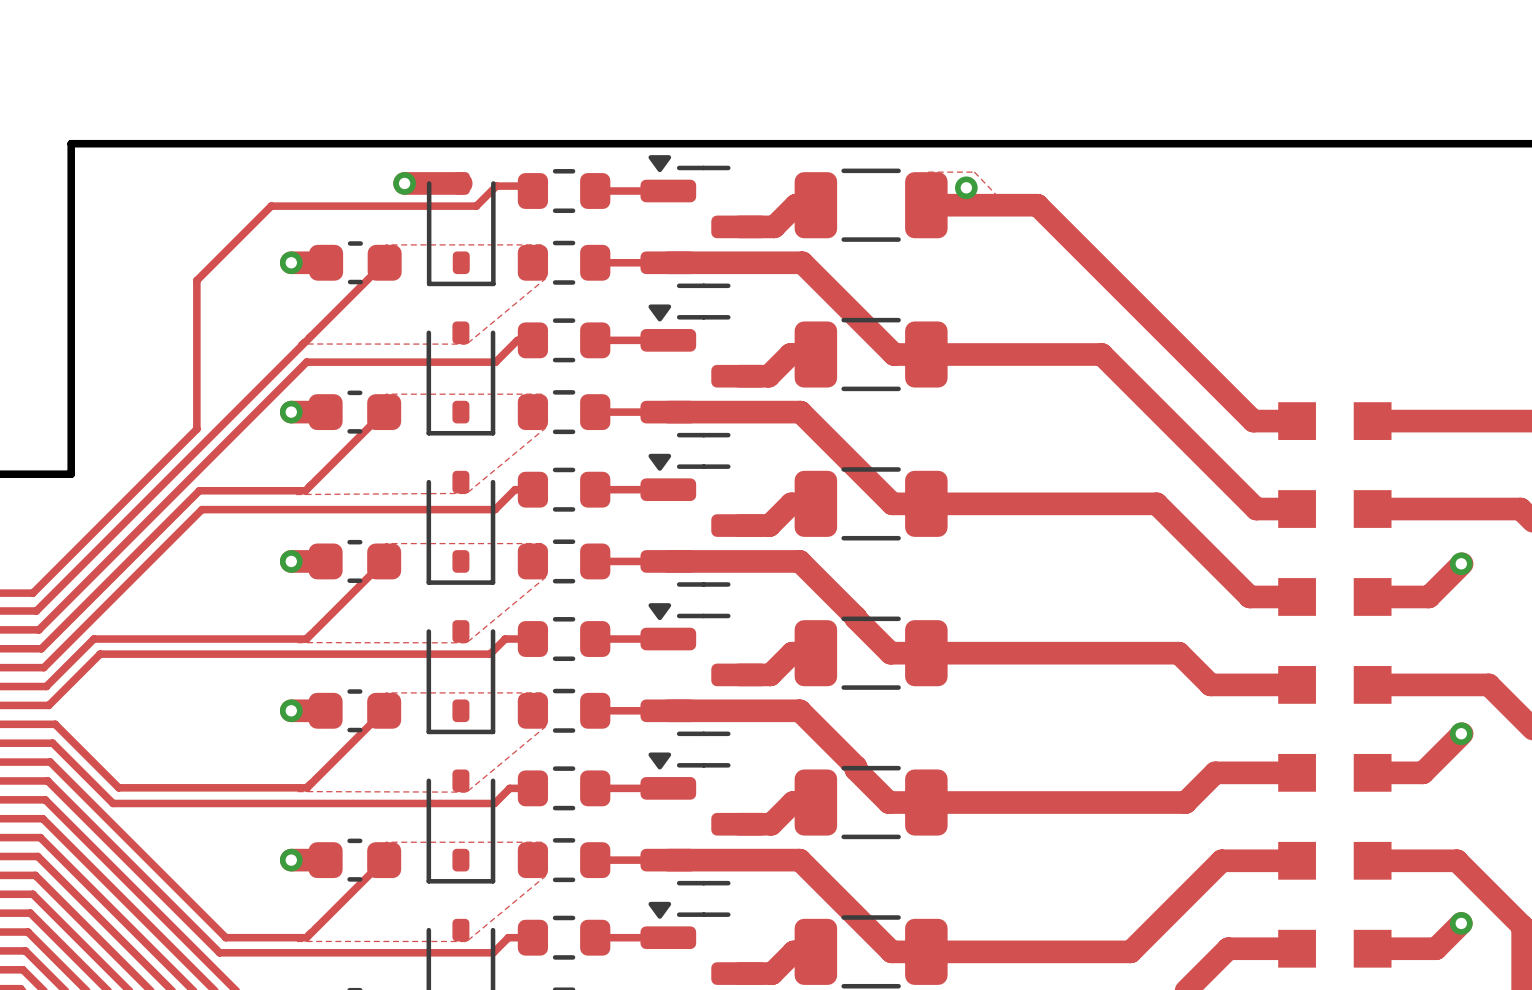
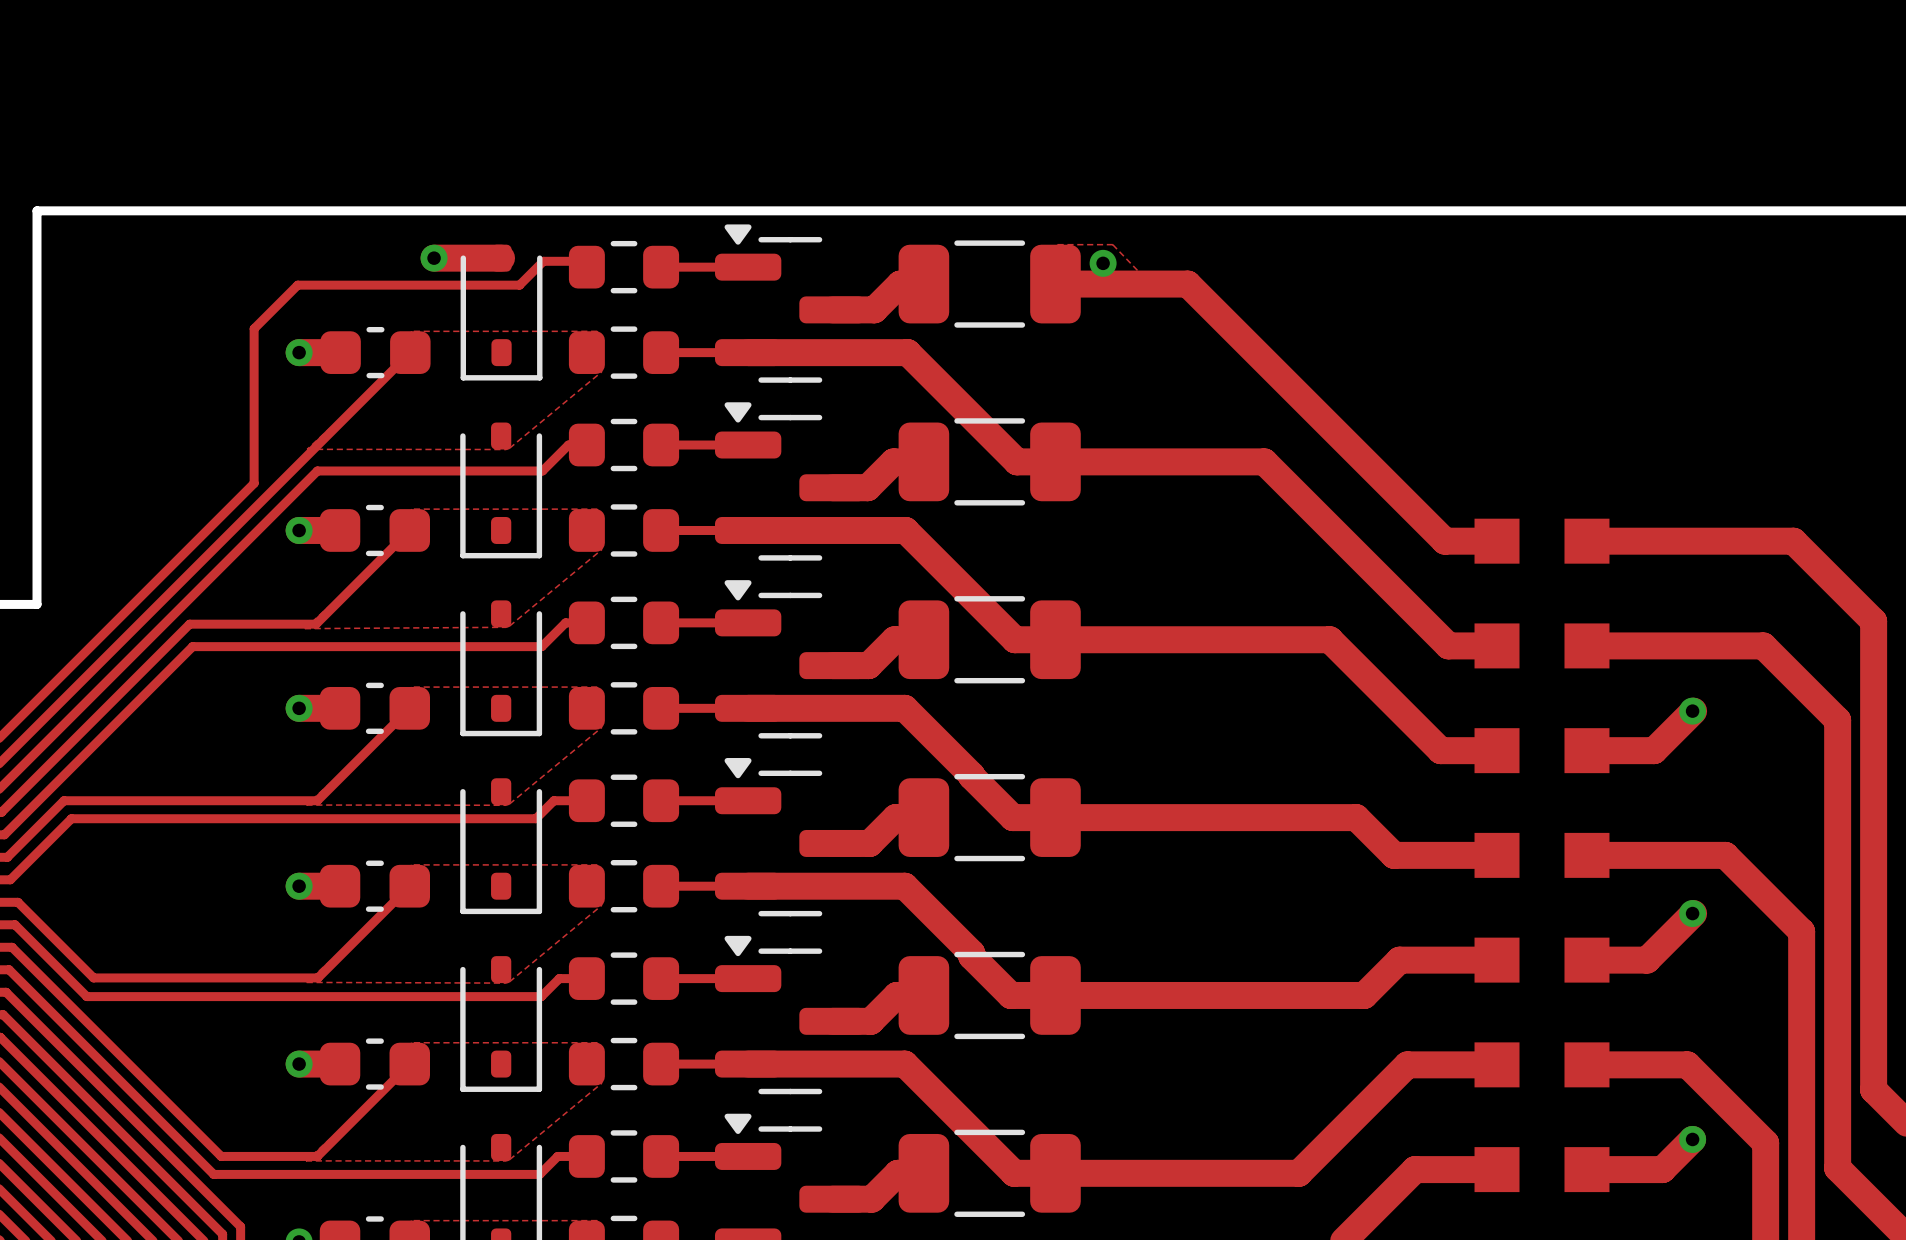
track: (290, 206) (271, 206) (196, 280) (196, 429) -> (297, 285) (254, 328) (254, 483) (186, 550)

